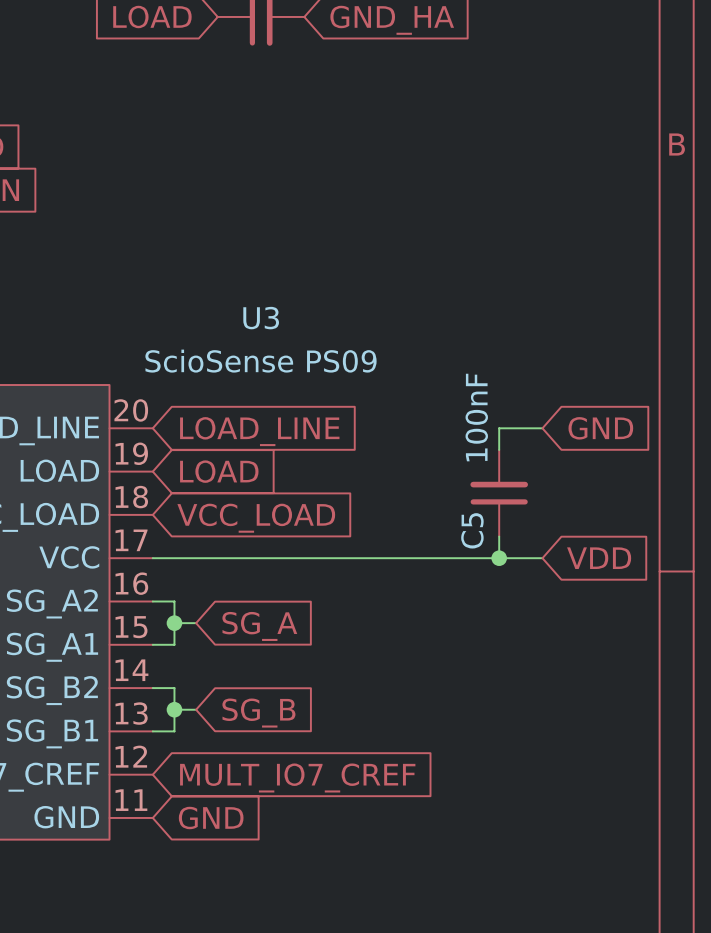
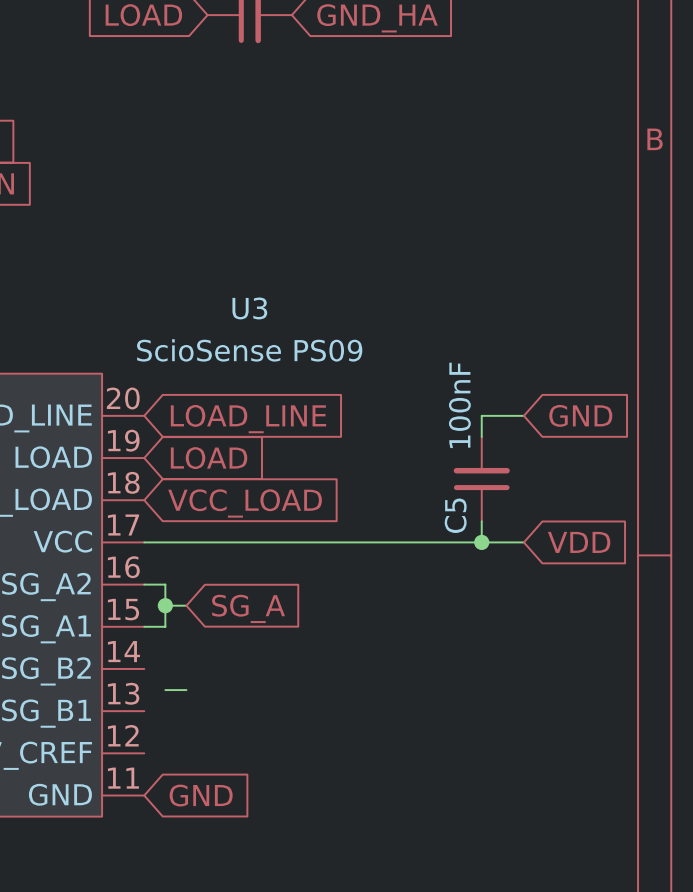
wire: (152, 688) (174, 688) (174, 731) (152, 731) -> none
junction: (174, 709) -> none
global label: SG_B (258, 713) -> none
global label: MULT_IO7_CREF (297, 777) -> none

